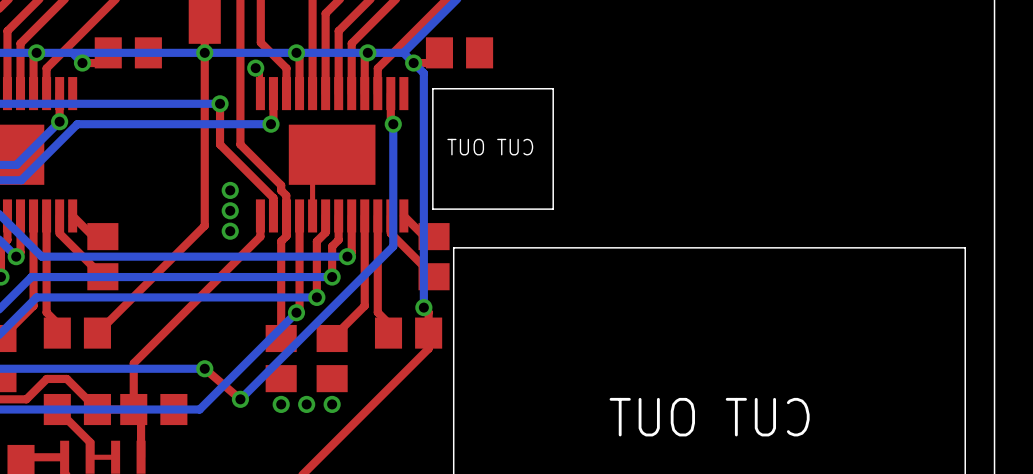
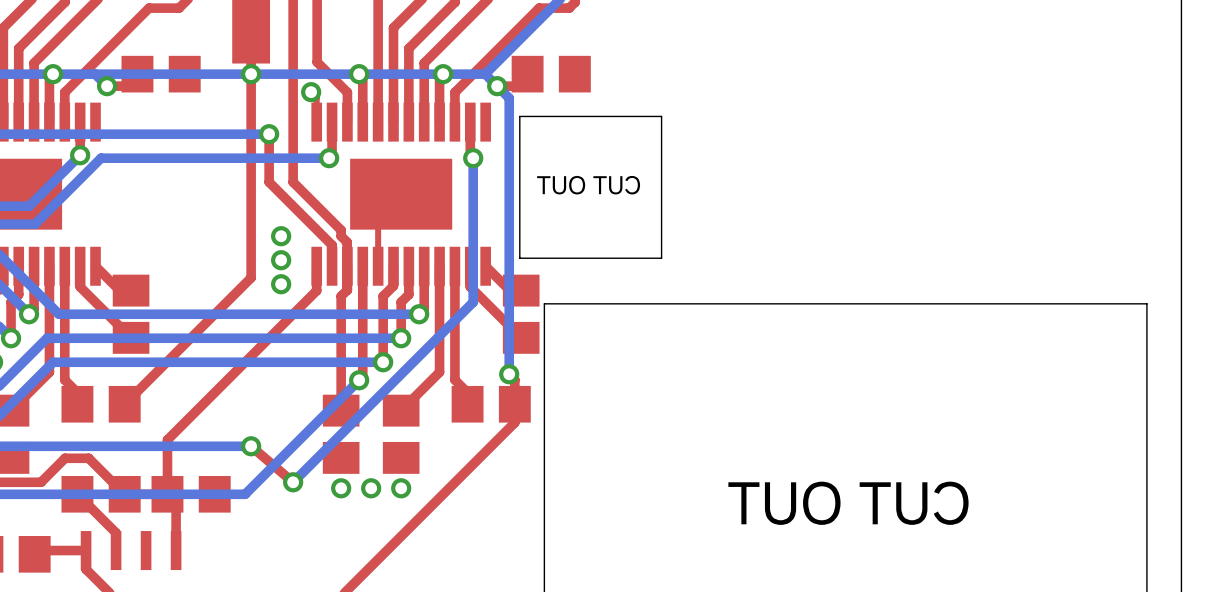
top track: (115, 457) (90, 457) -> none

